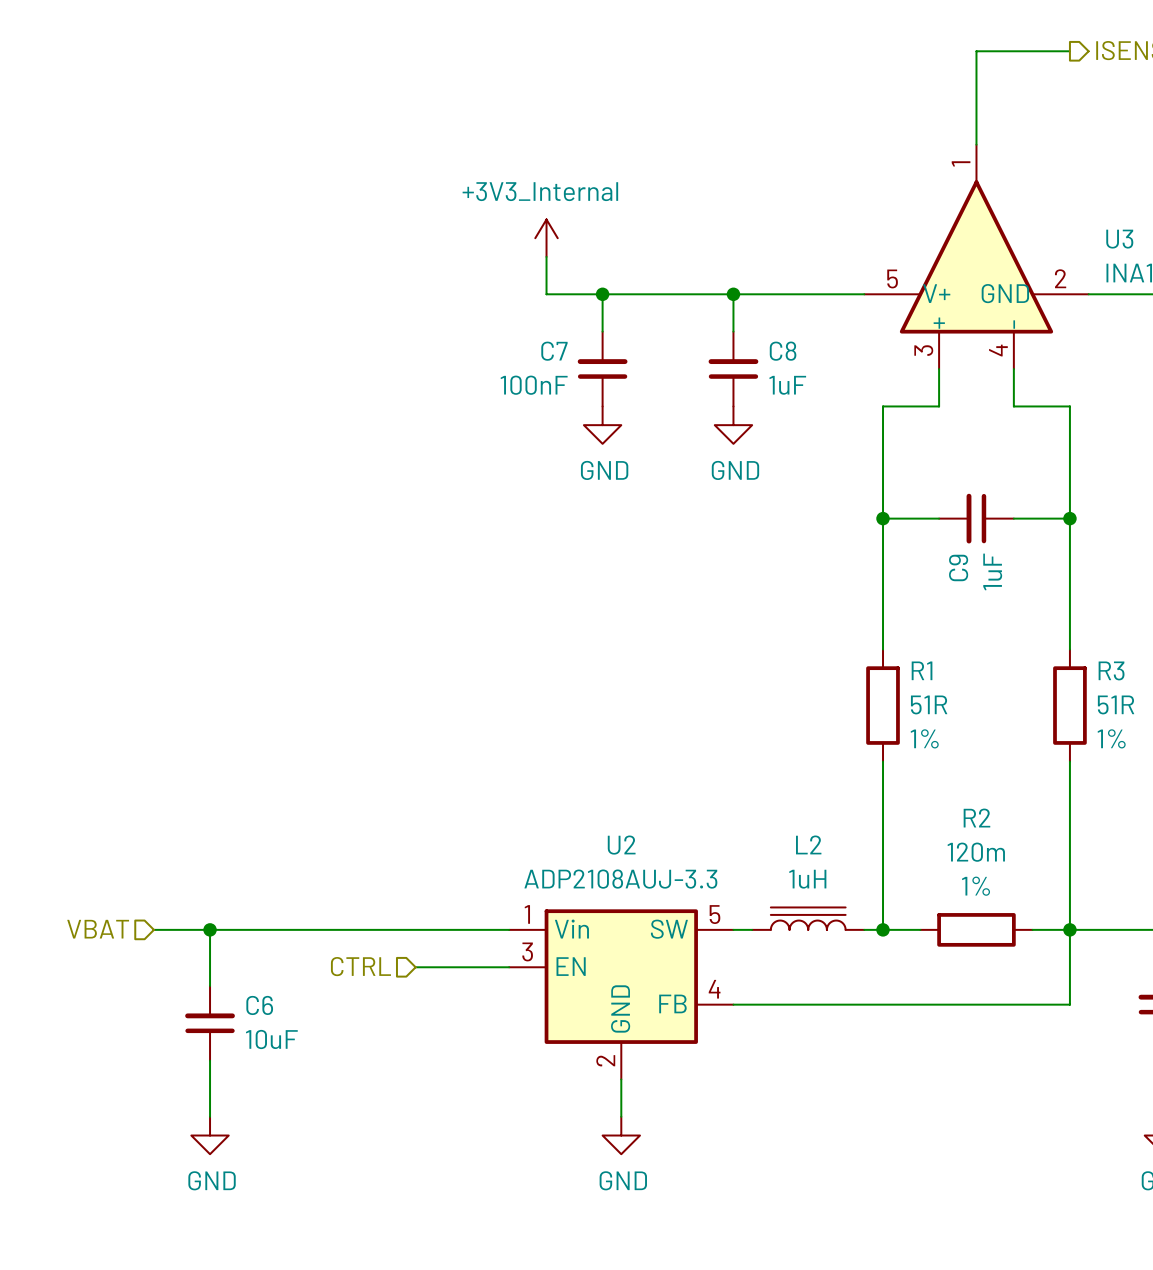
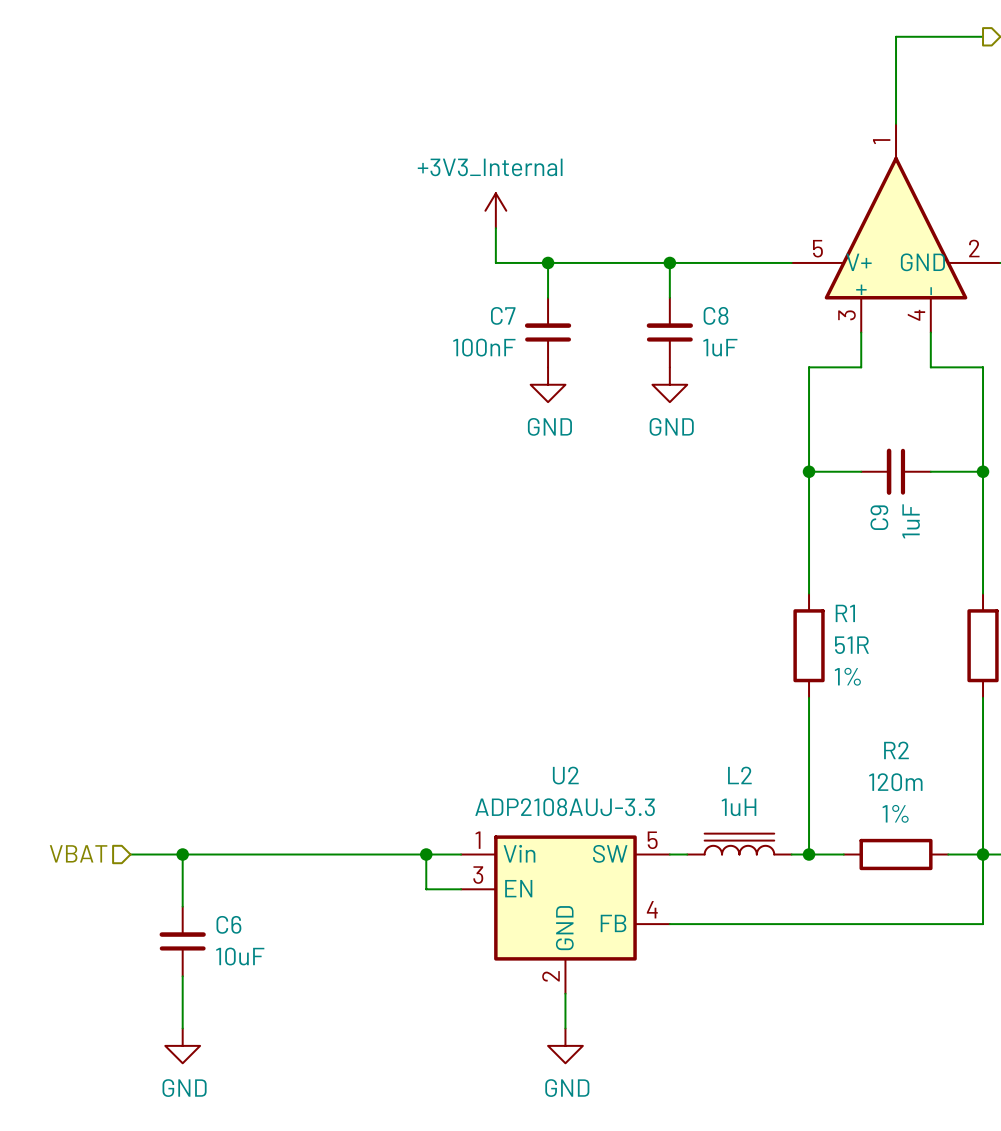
junction: none -> (426, 854)
hierarchical label: CTRL (360, 966) -> none
wire: (415, 967) (471, 967) -> (426, 854) (426, 889)

